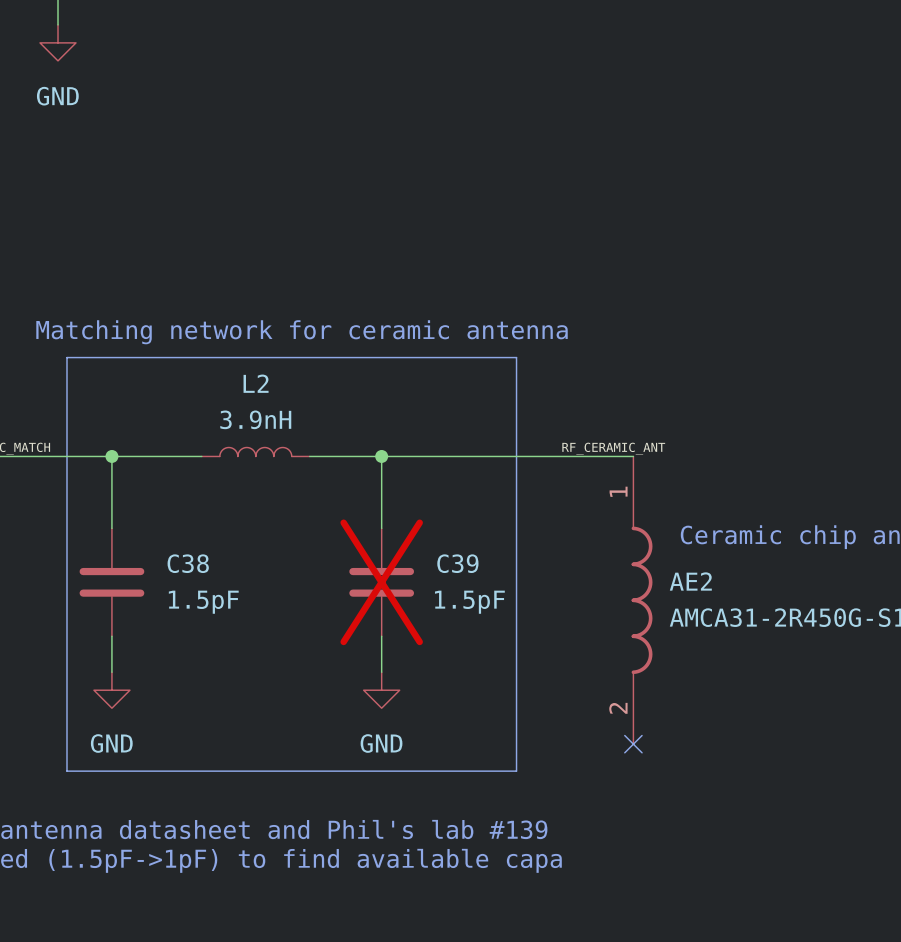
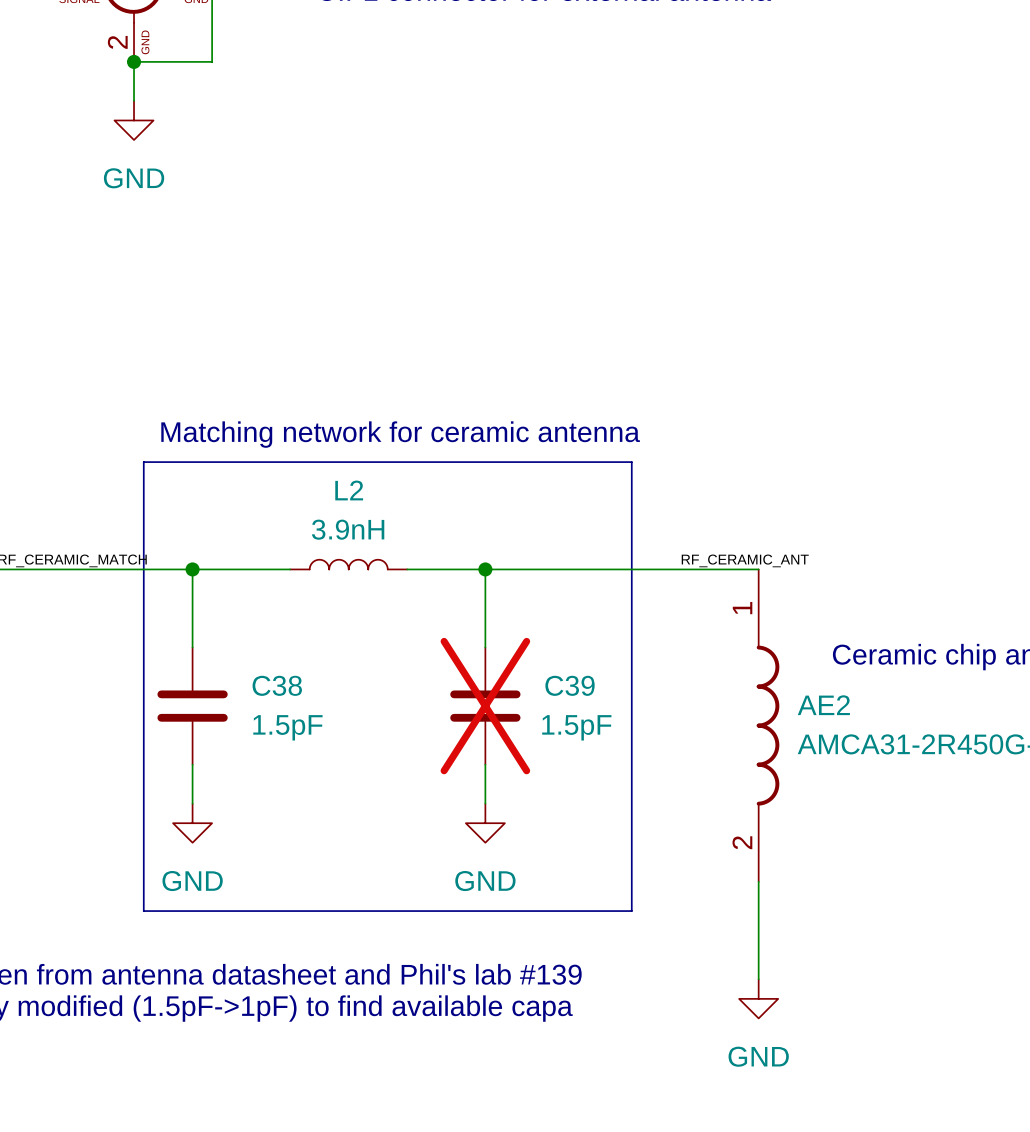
wire: none -> (758, 881) (758, 979)
no-connect mark: (633, 744) -> none
power symbol: none -> GND (758, 998)

